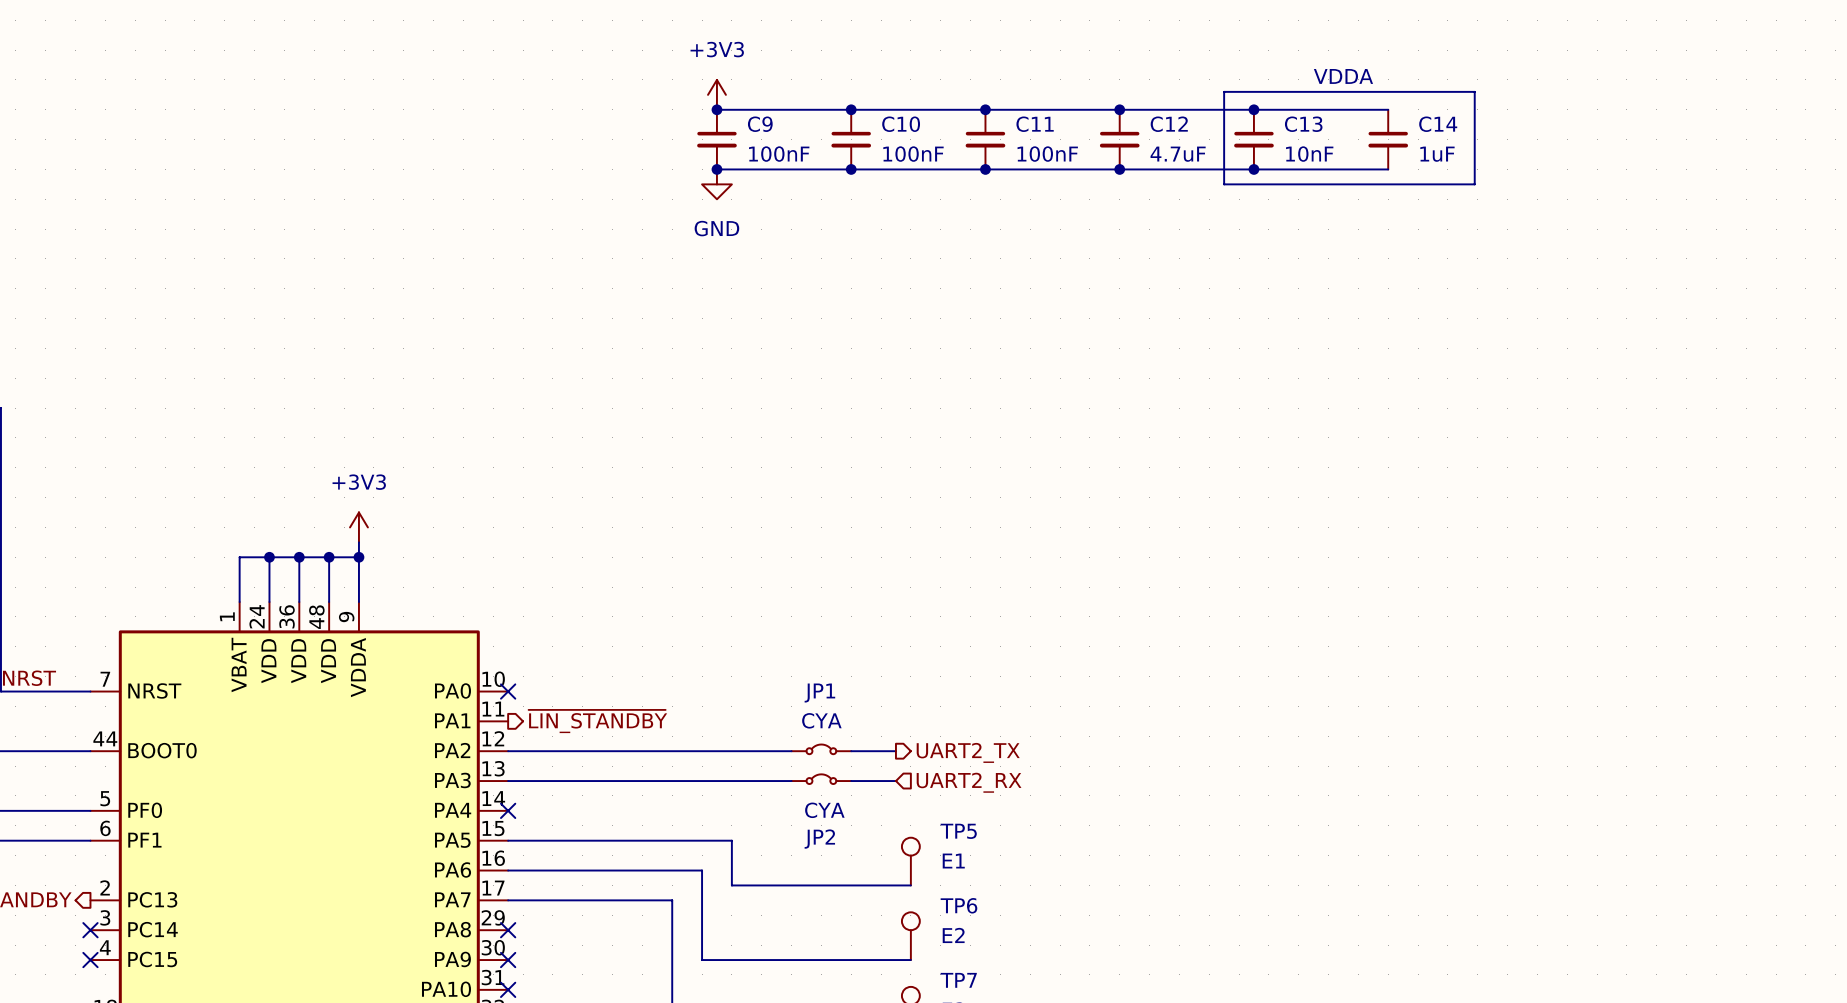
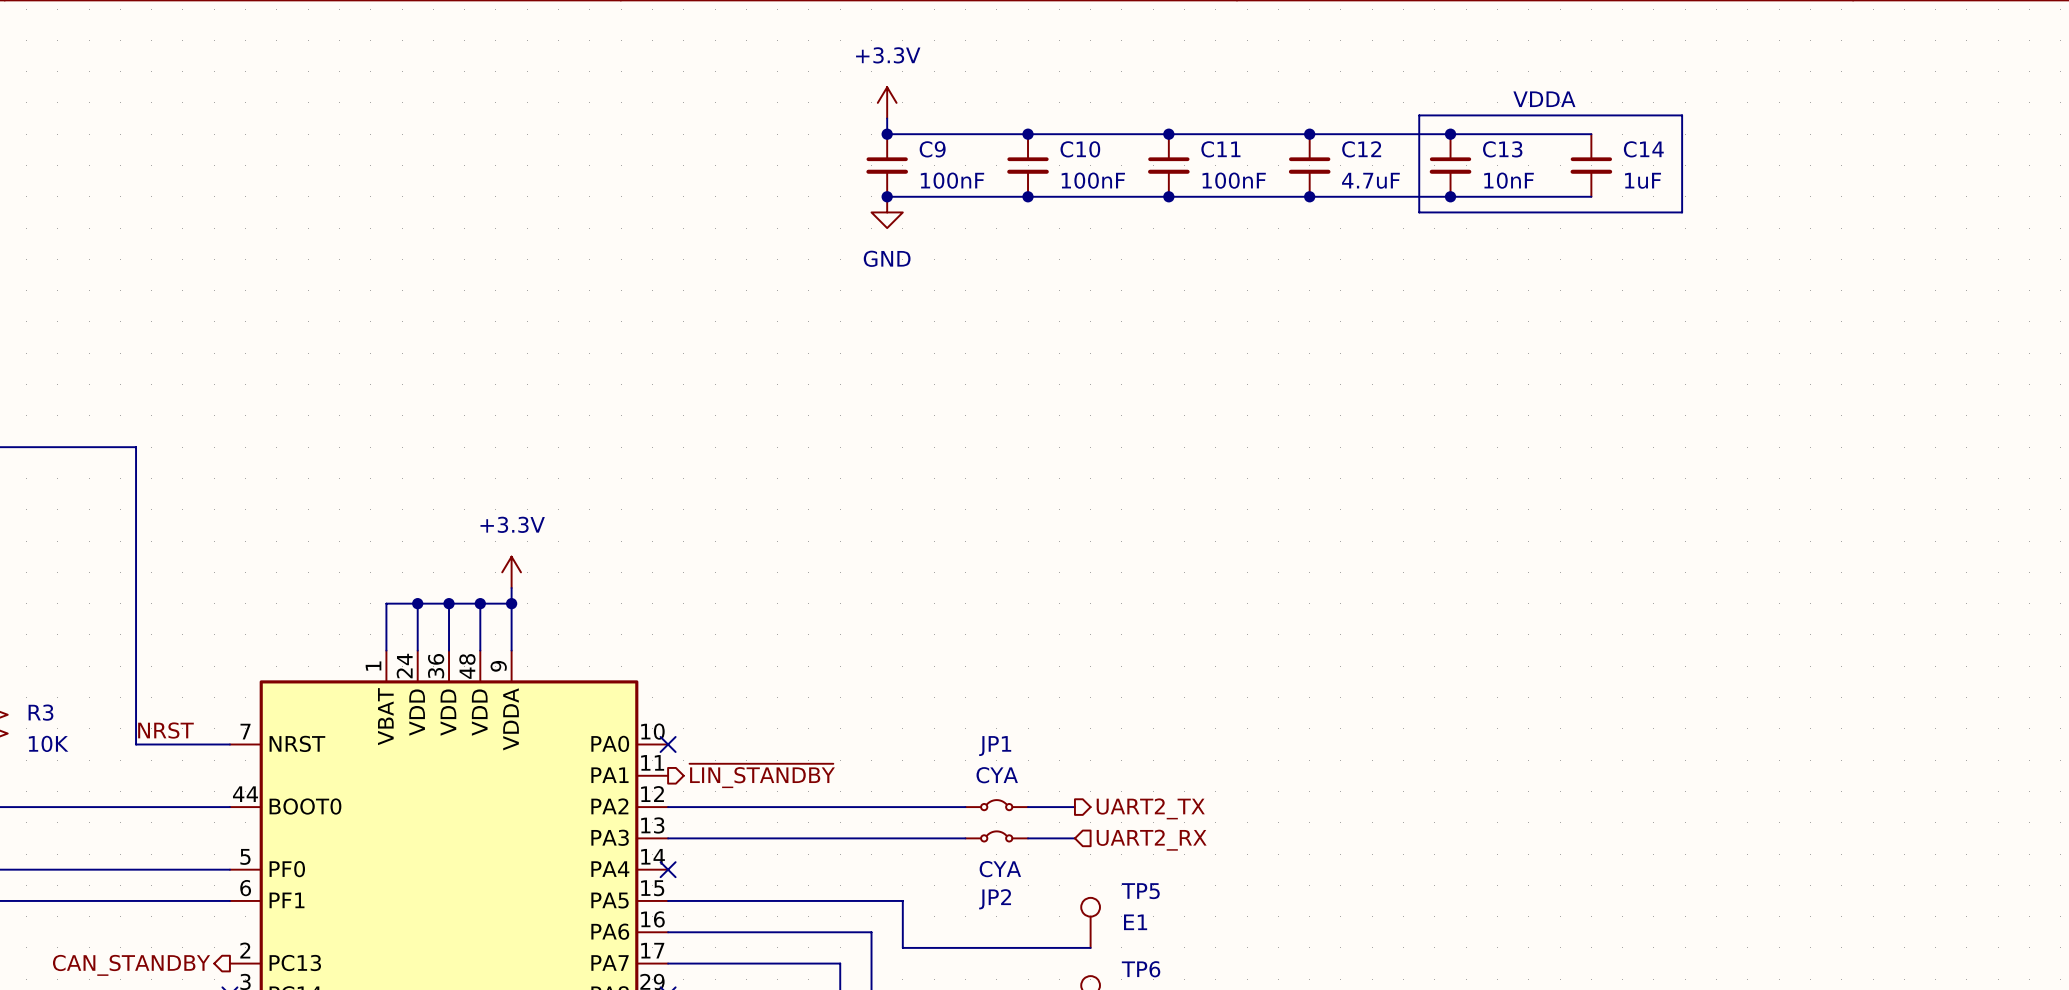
power symbol: none -> +3.3V (887, 102)
power symbol: +3V3 (716, 94) -> none
power symbol: +3V3 (358, 527) -> +3.3V (511, 572)

